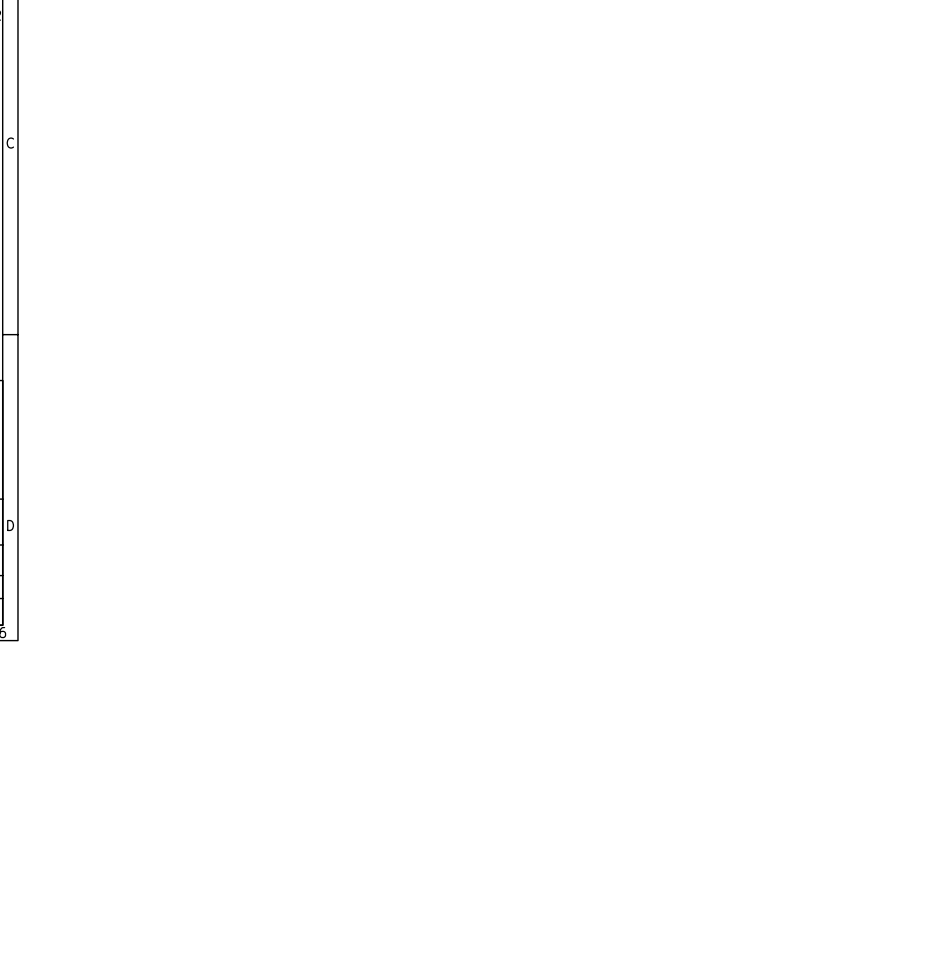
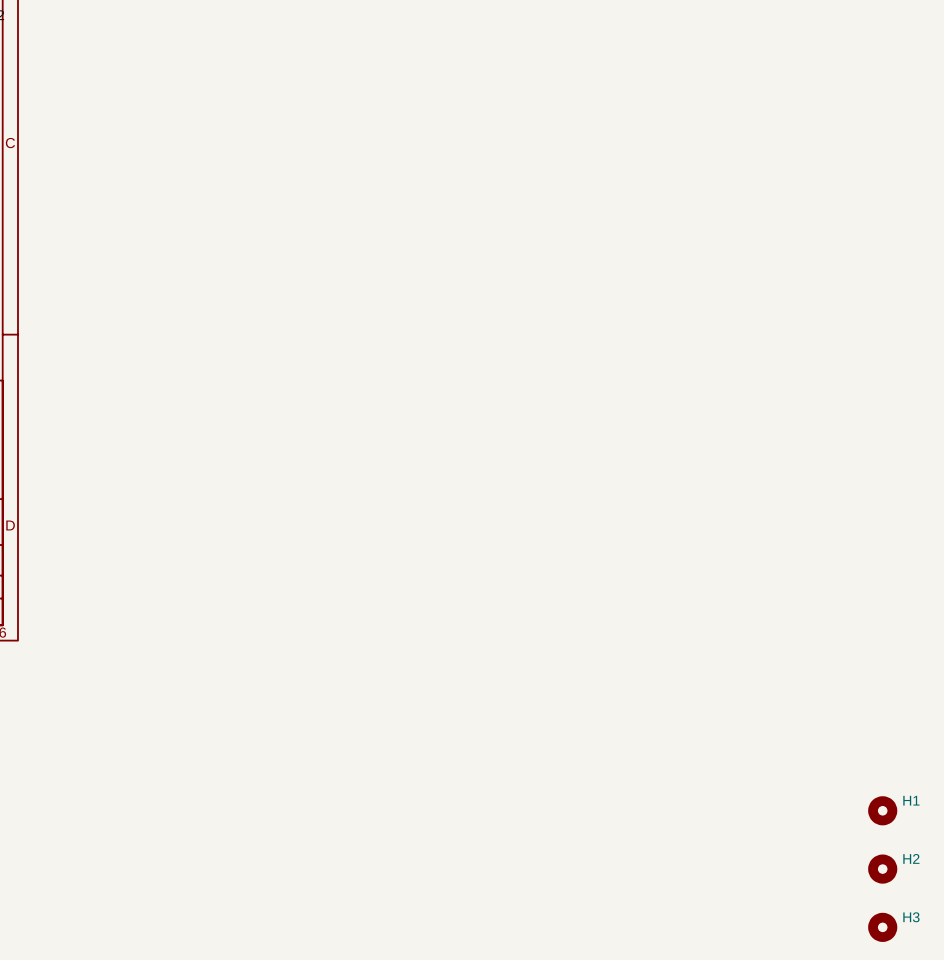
H1: none -> (882, 810)
H2: none -> (882, 869)
H3: none -> (882, 927)

